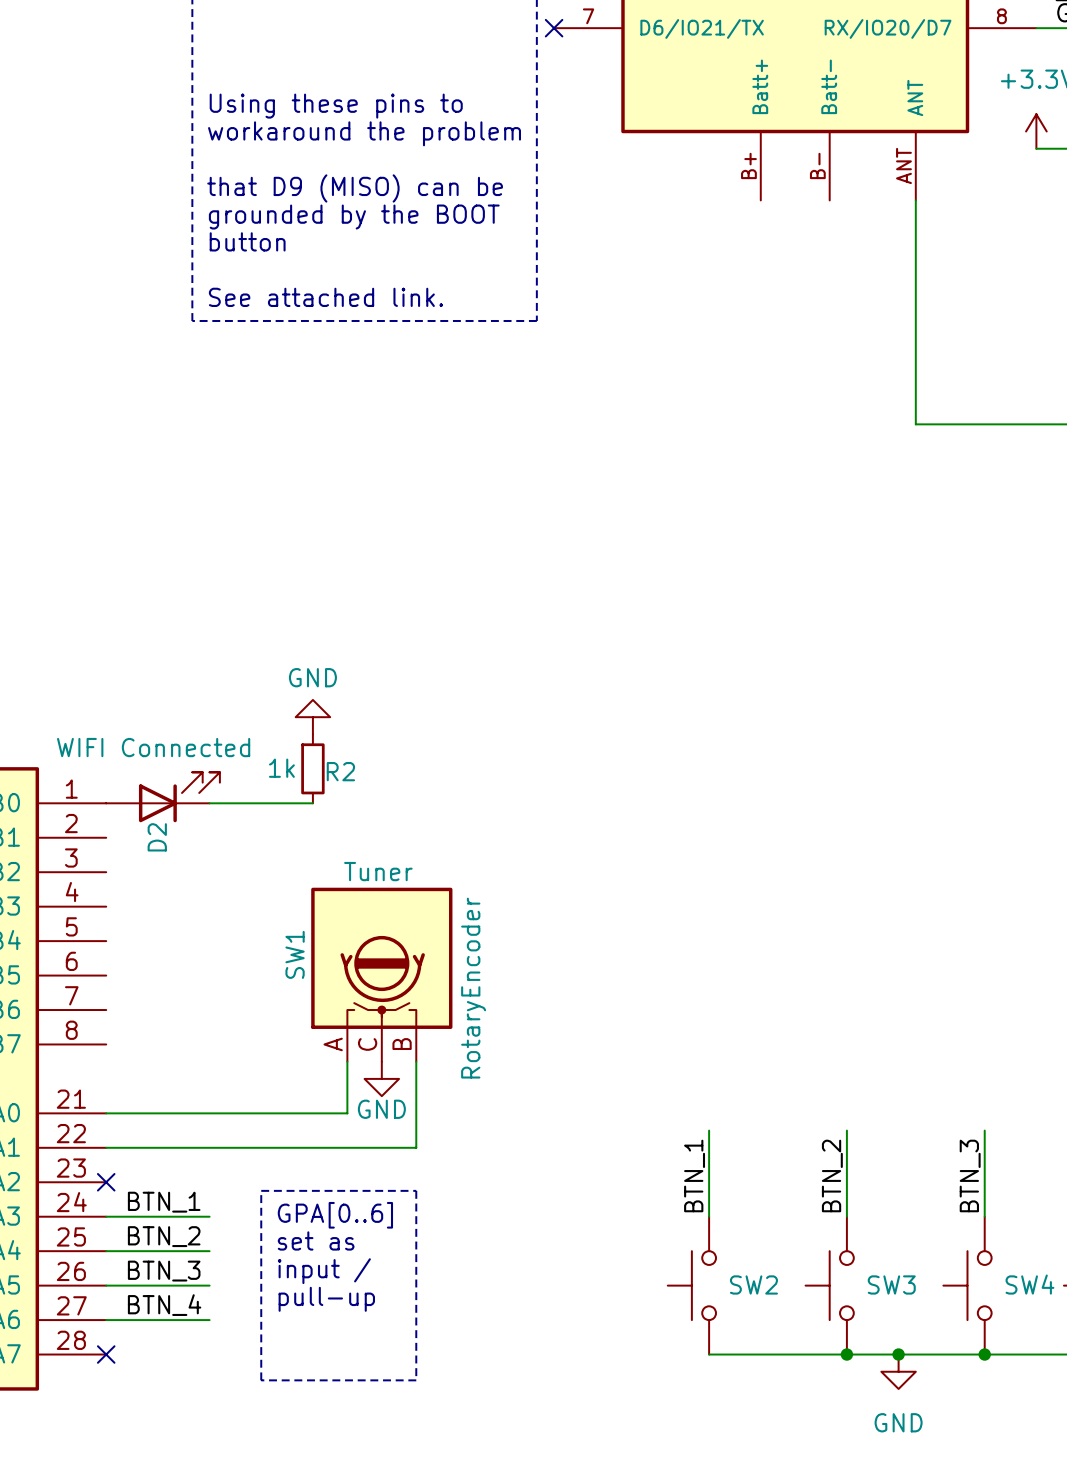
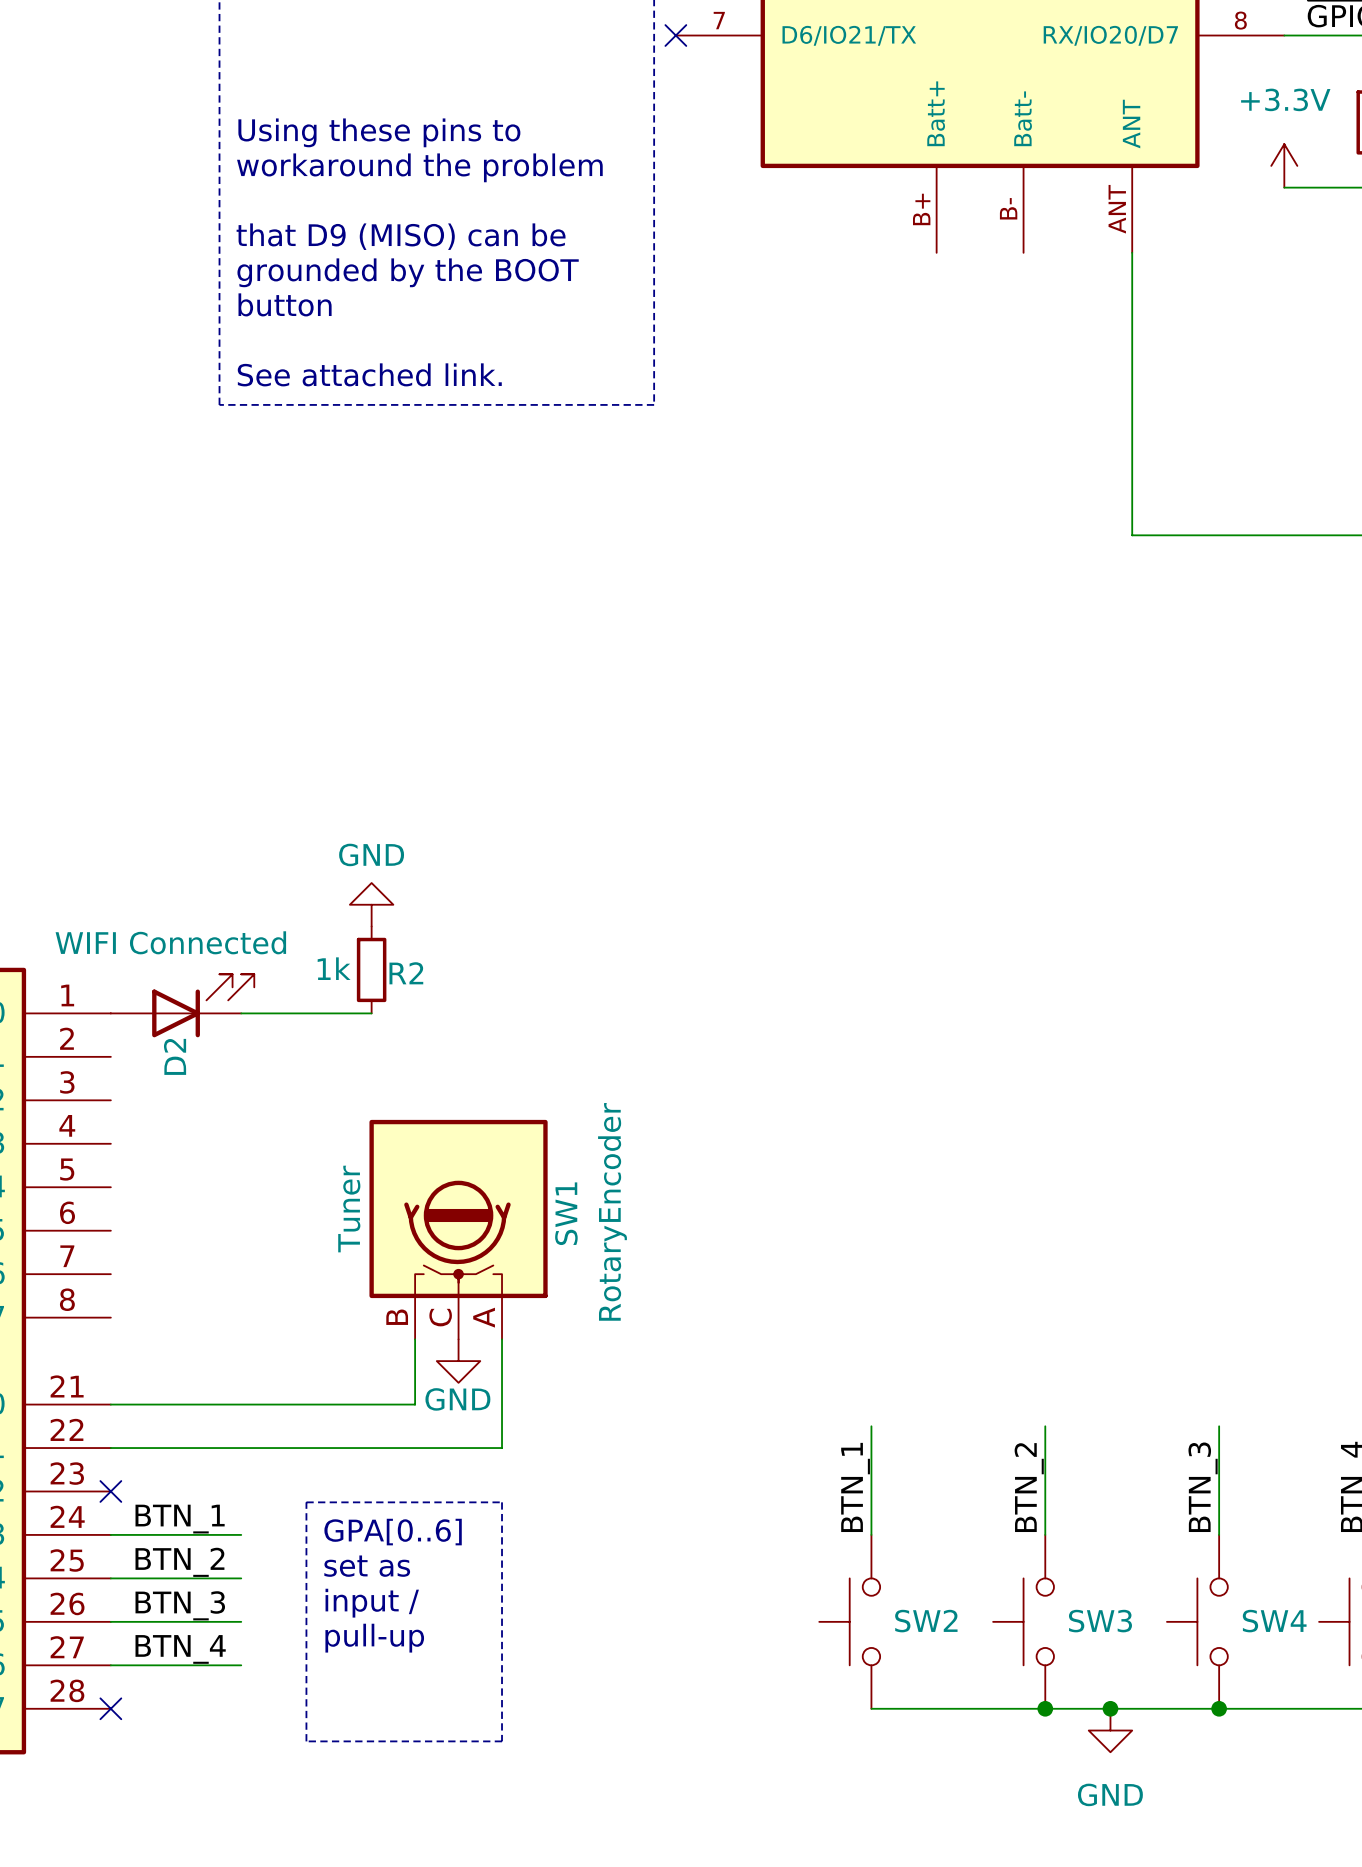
SW1 text position: Tuner (378, 871) -> Tuner (349, 1209)
SW1 flip: as is (381, 958) -> left-right (458, 1208)
SW1 value position: RotaryEncoder (473, 988) -> RotaryEncoder (612, 1211)

